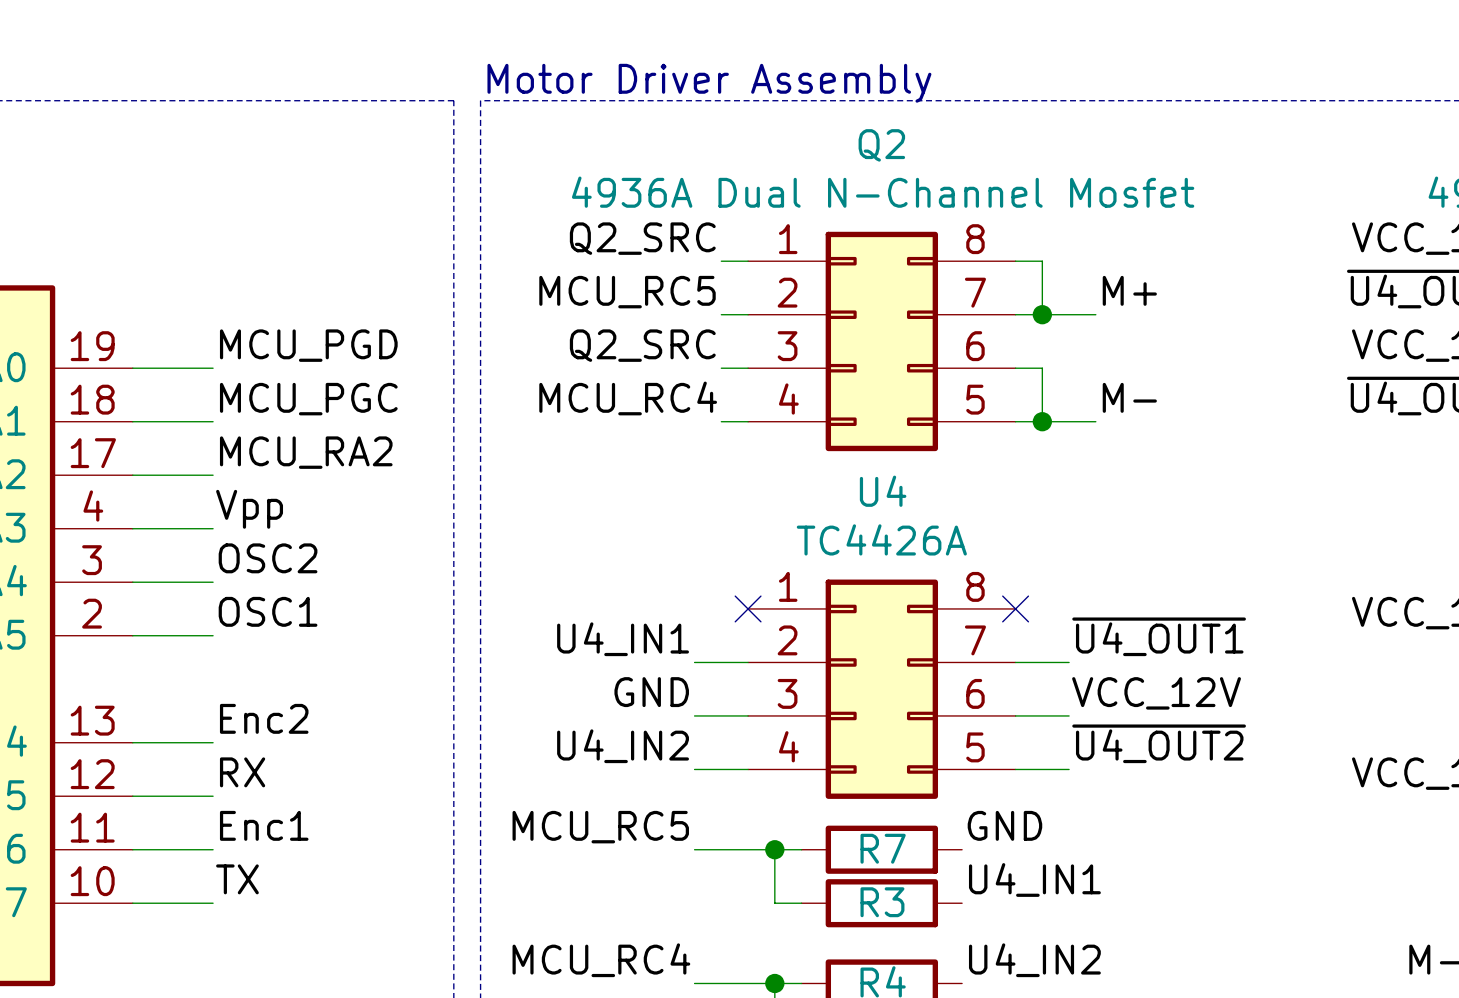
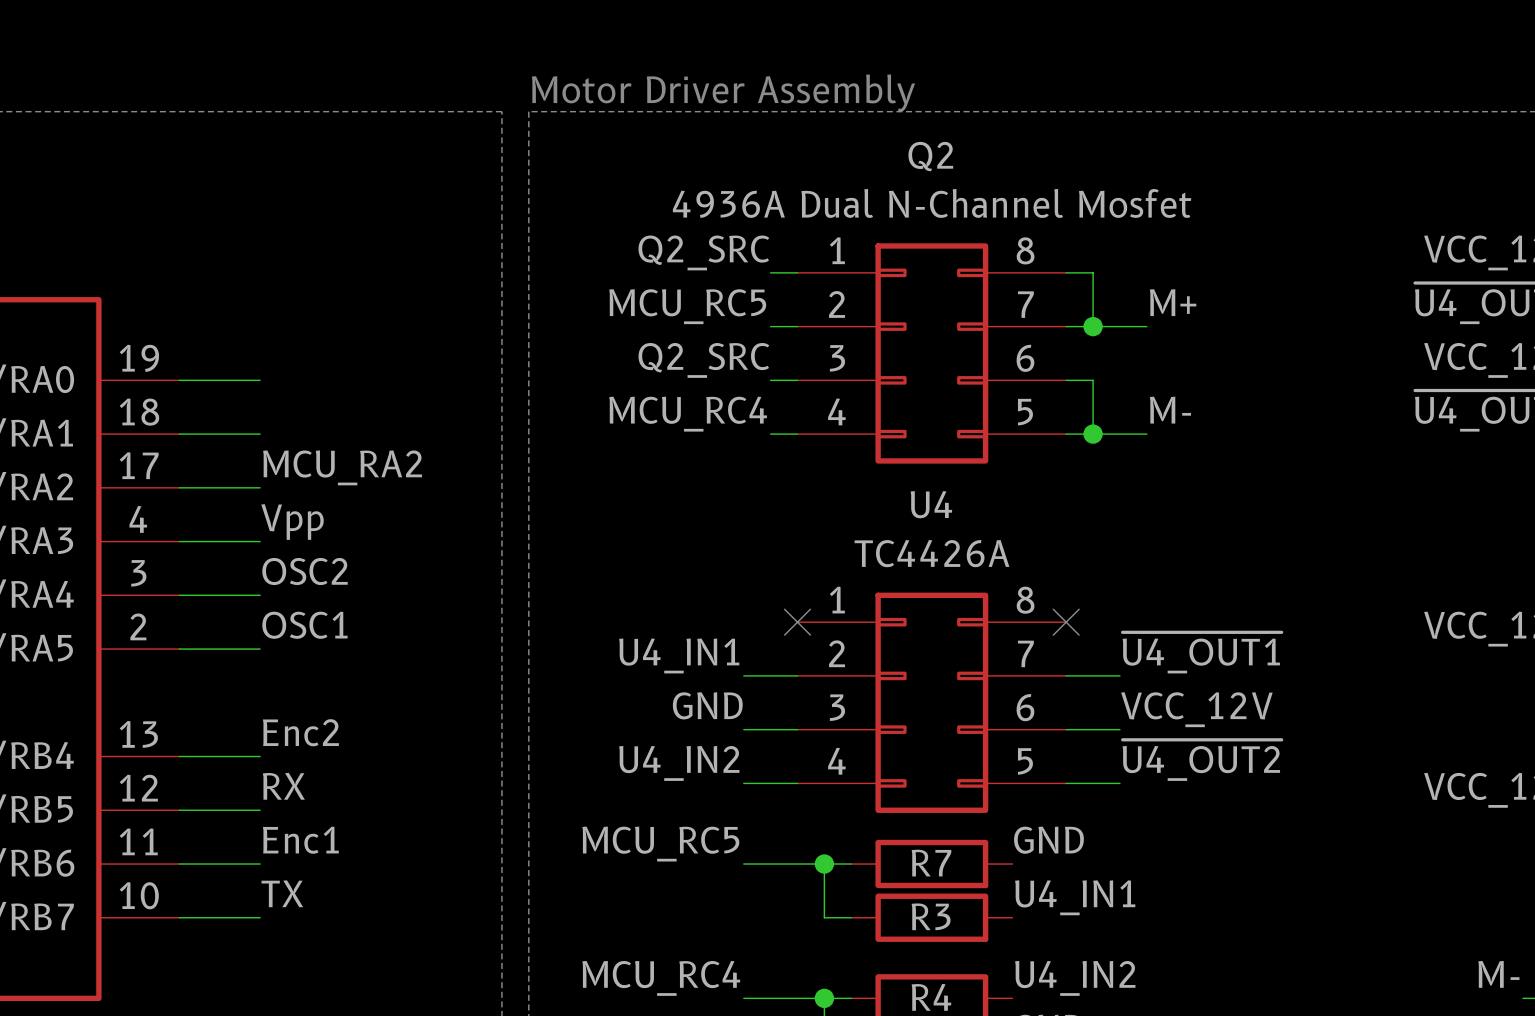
label: MCU_PGD (308, 345) -> none
label: MCU_PGC (308, 399) -> none

